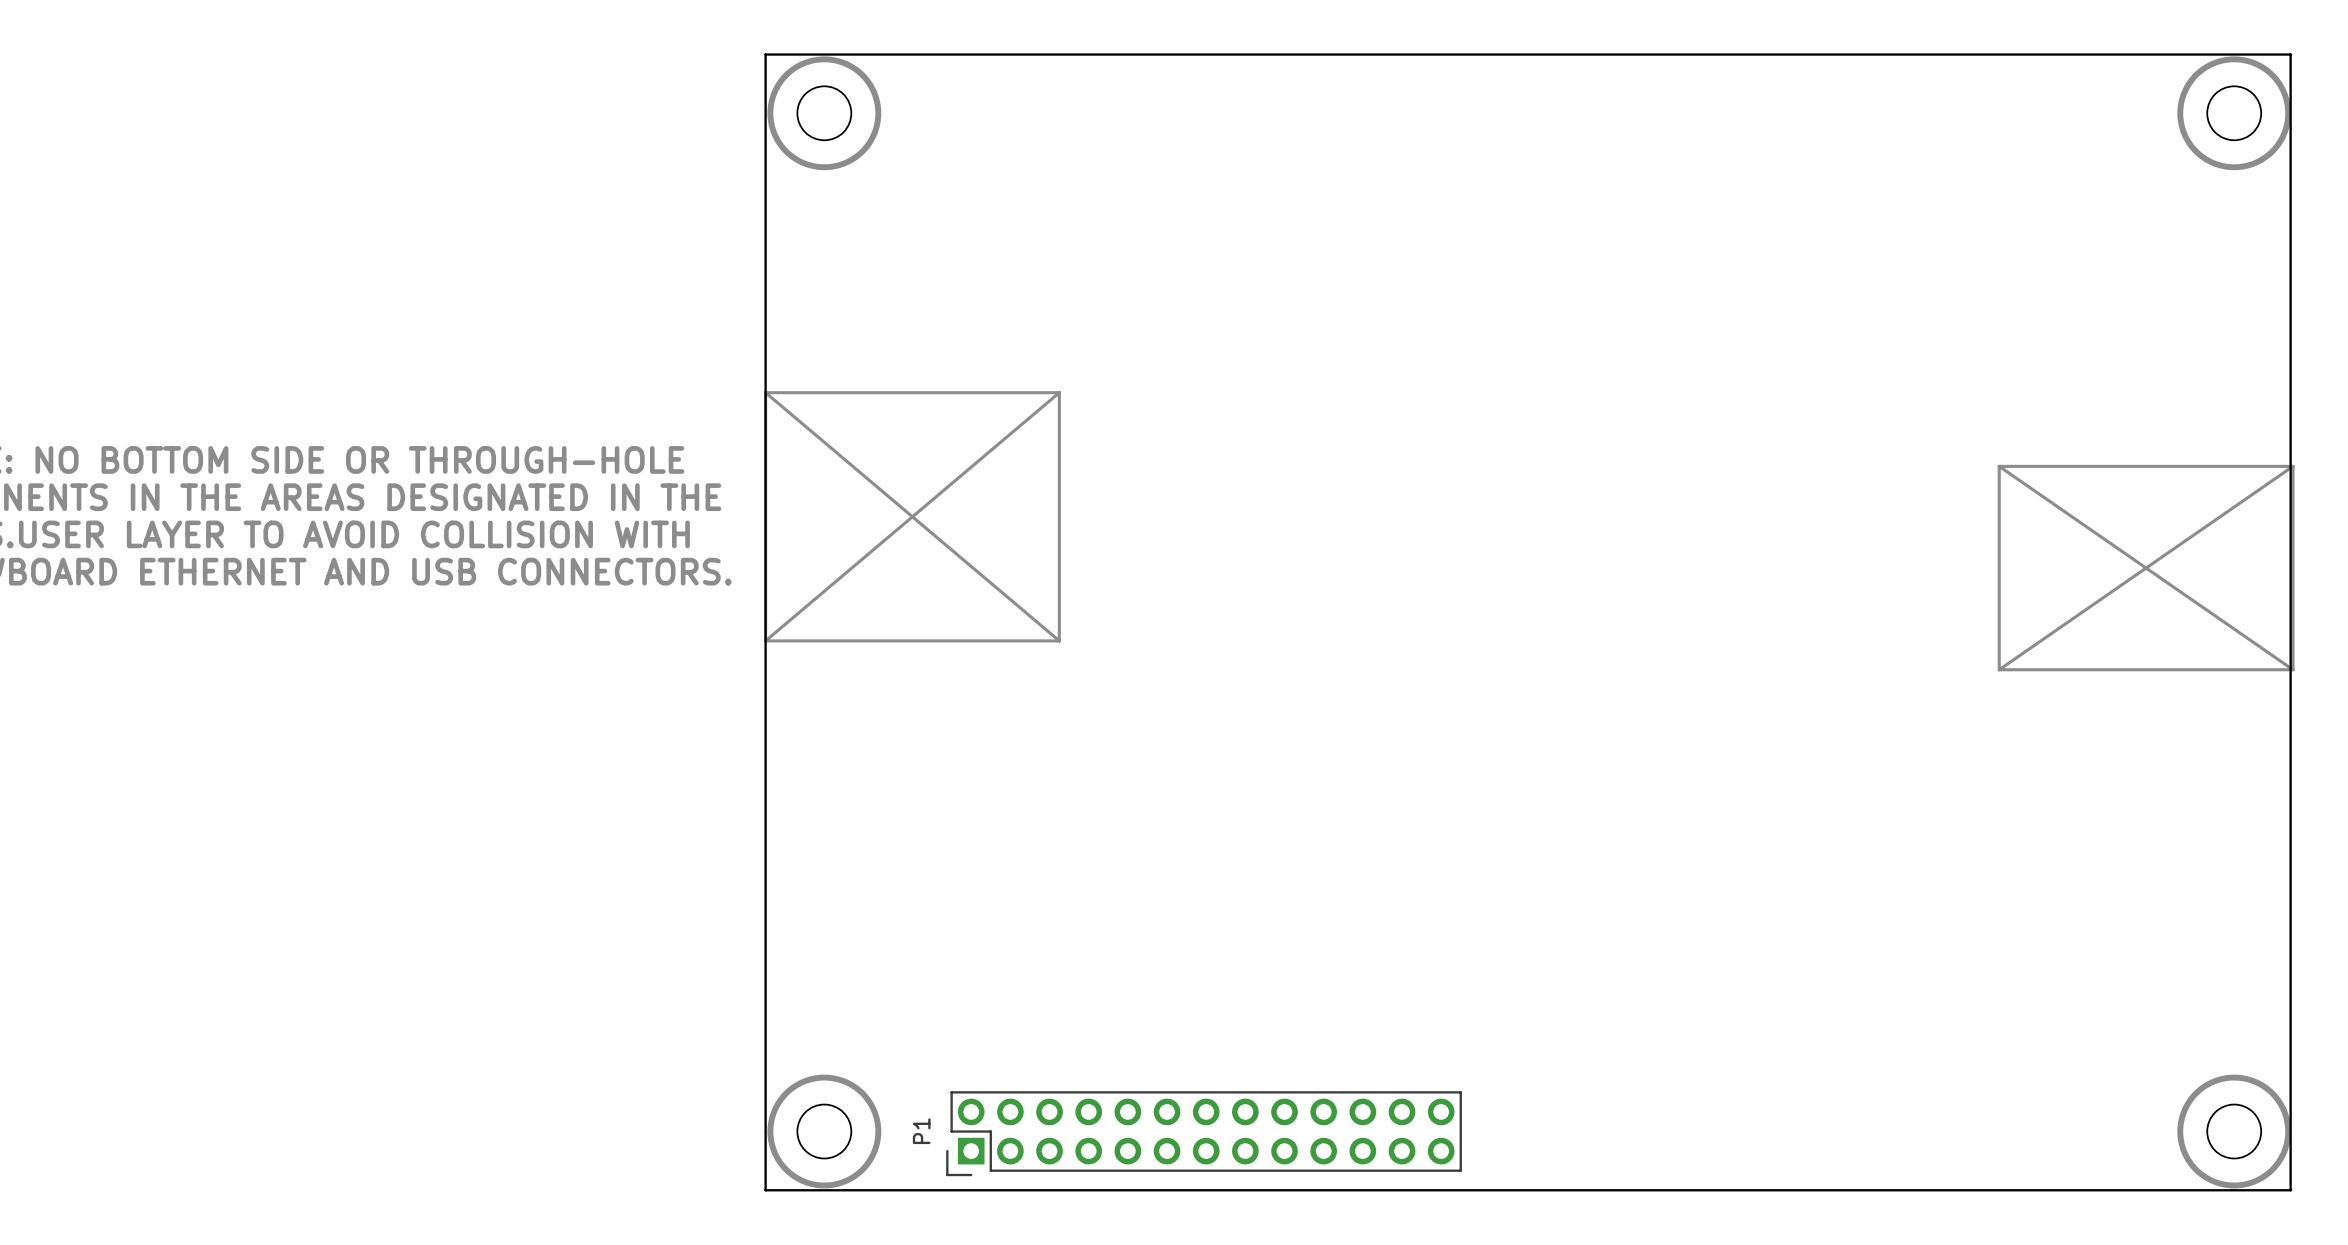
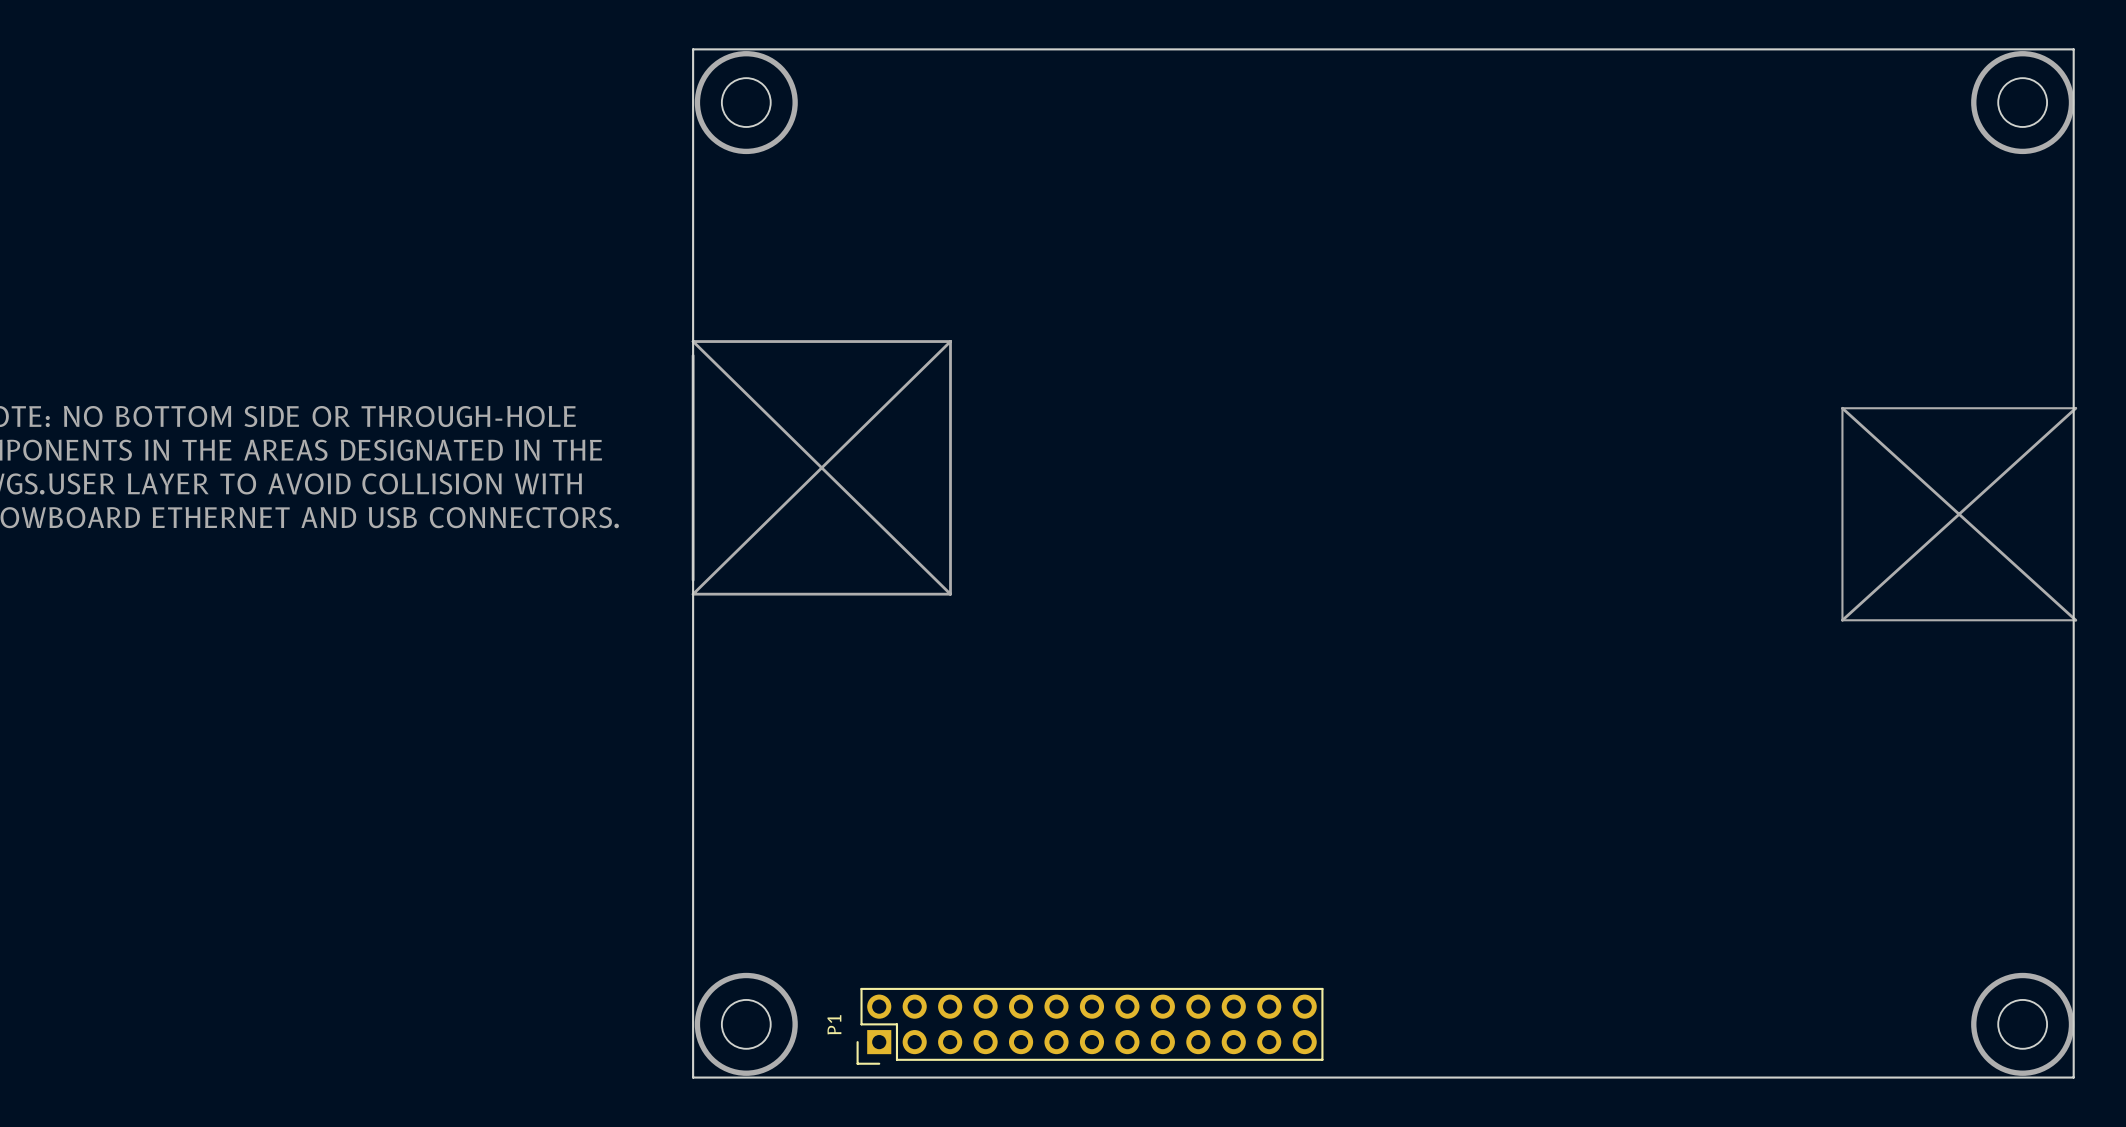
line: none -> (950, 341) (950, 594)
line: none -> (950, 341) (693, 341) (950, 594)
line: none -> (950, 341) (693, 594) (950, 594)
line: (1059, 392) (765, 640) (1059, 640) -> none
line: (1059, 392) (1059, 640) -> none
line: (1059, 392) (765, 392) (1059, 640) -> none
line: none -> (1842, 408) (2075, 620) (1842, 620)
line: none -> (1842, 408) (1842, 620)
line: none -> (1842, 408) (2075, 408) (1842, 620)
line: (1999, 466) (2292, 669) -> none
line: (1999, 466) (1999, 669) -> none
line: (1999, 466) (2292, 466) -> none
line: (2292, 466) (1999, 669) -> none
line: (2292, 466) (2292, 669) -> none
line: (1999, 669) (2292, 669) -> none

